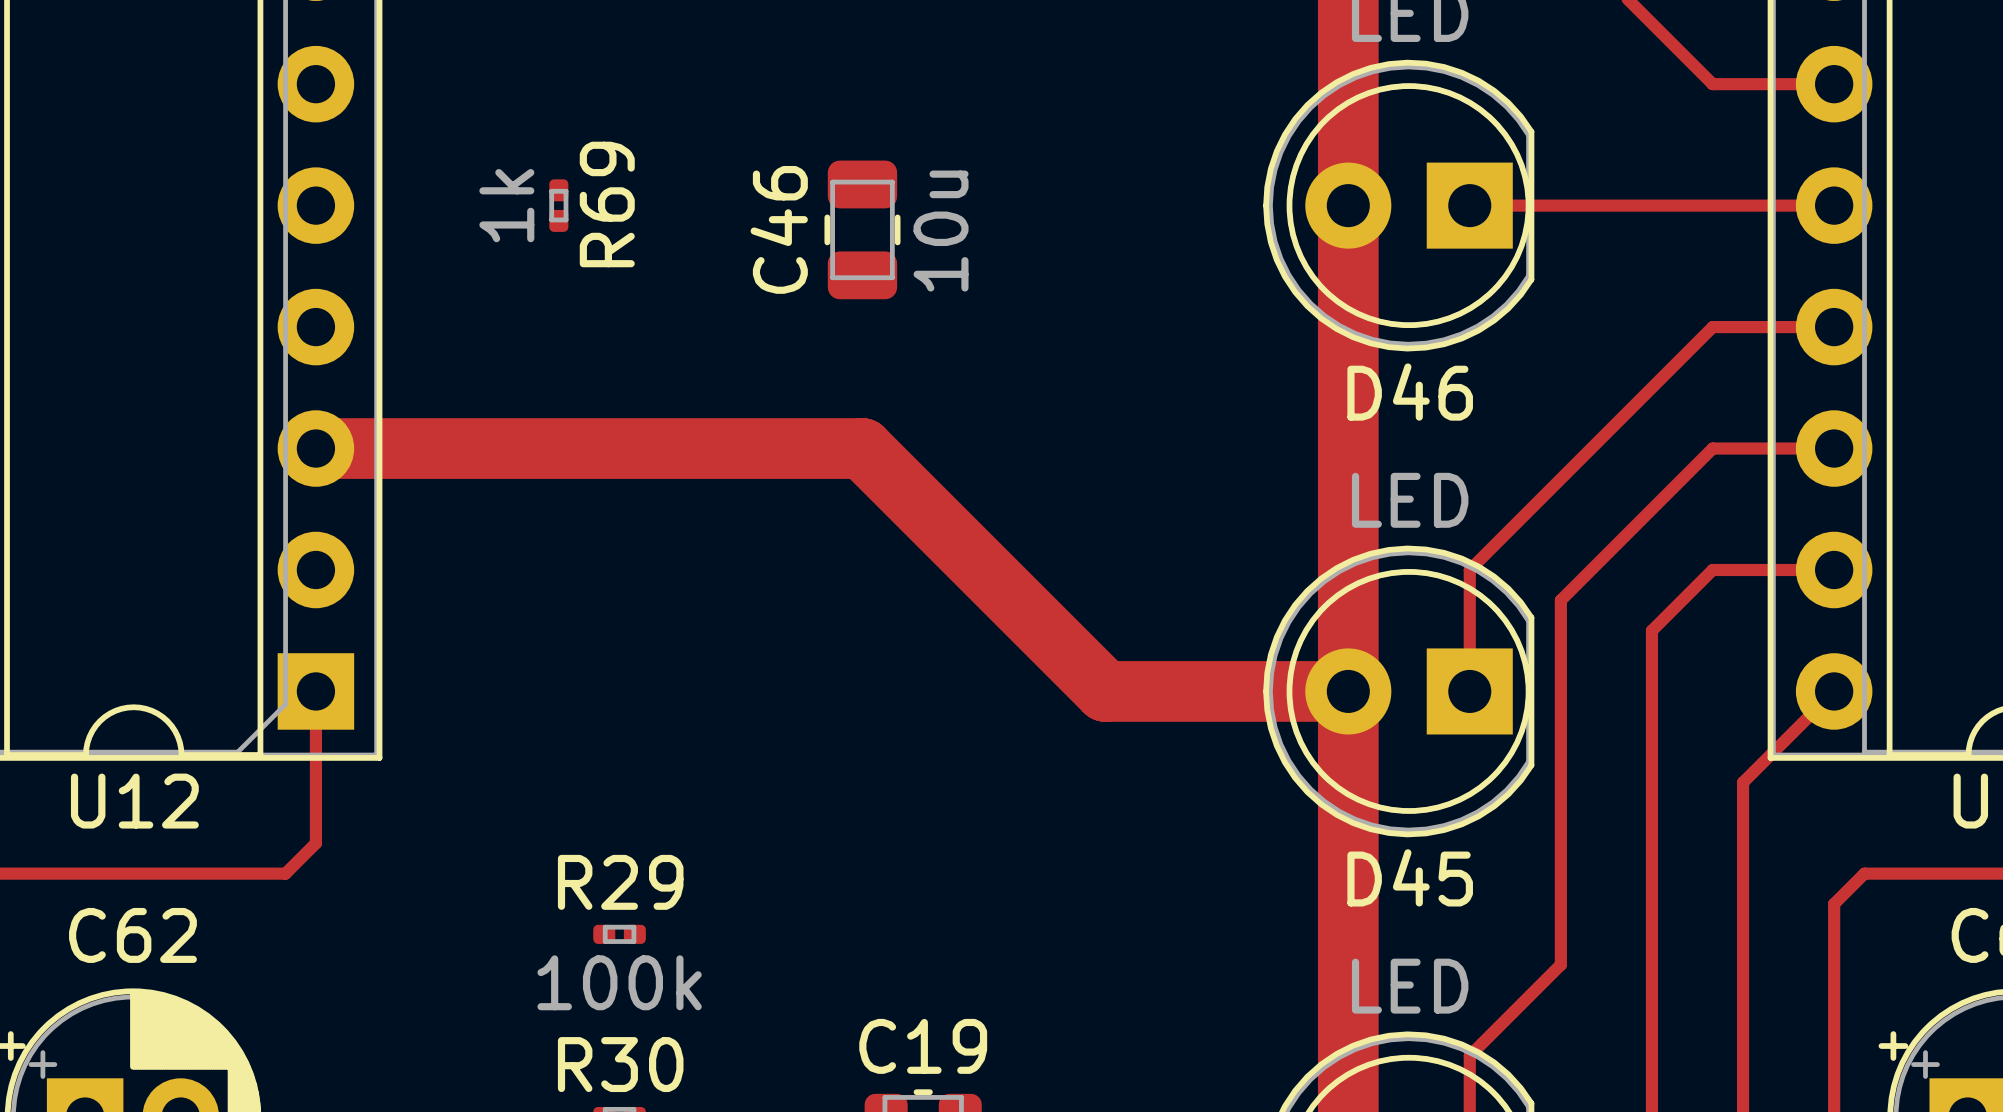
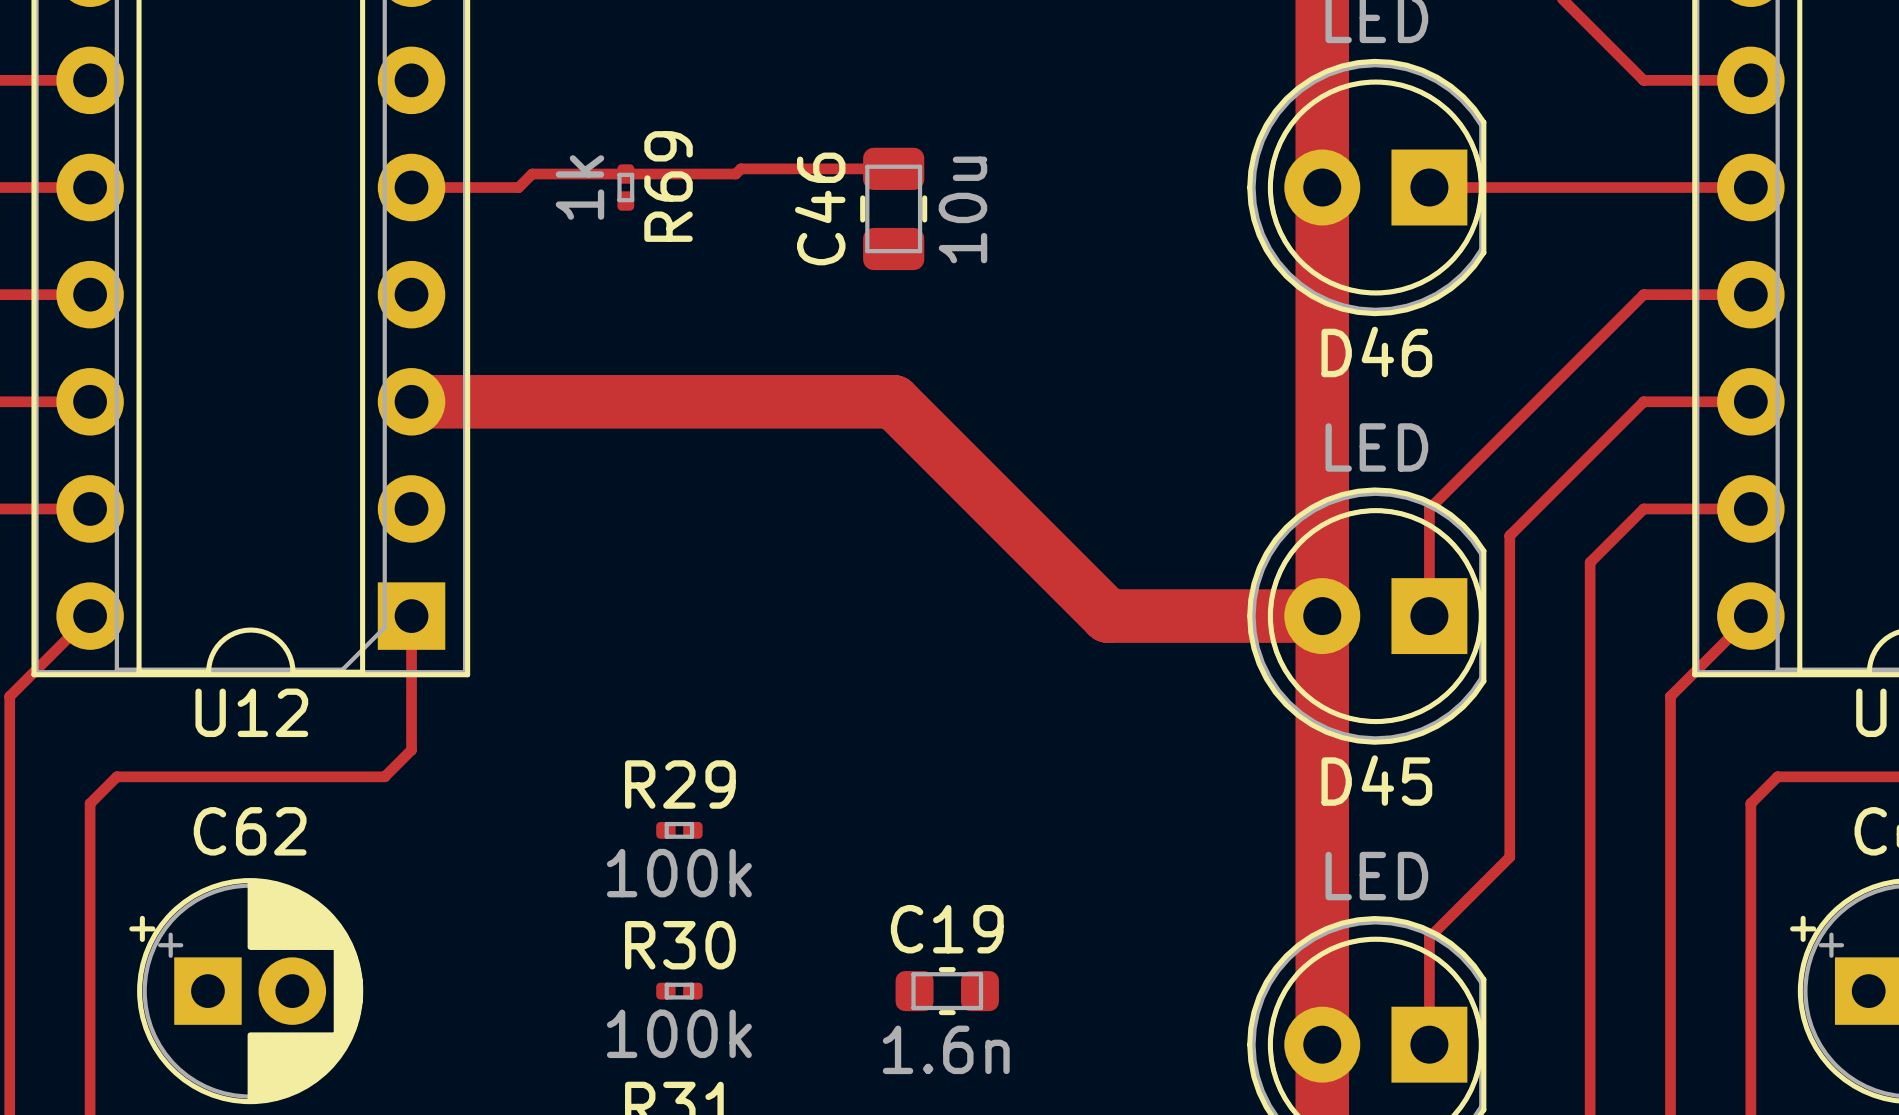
track: none -> (893, 168) (740, 168) (735, 174) (532, 174) (518, 187) (411, 187)

